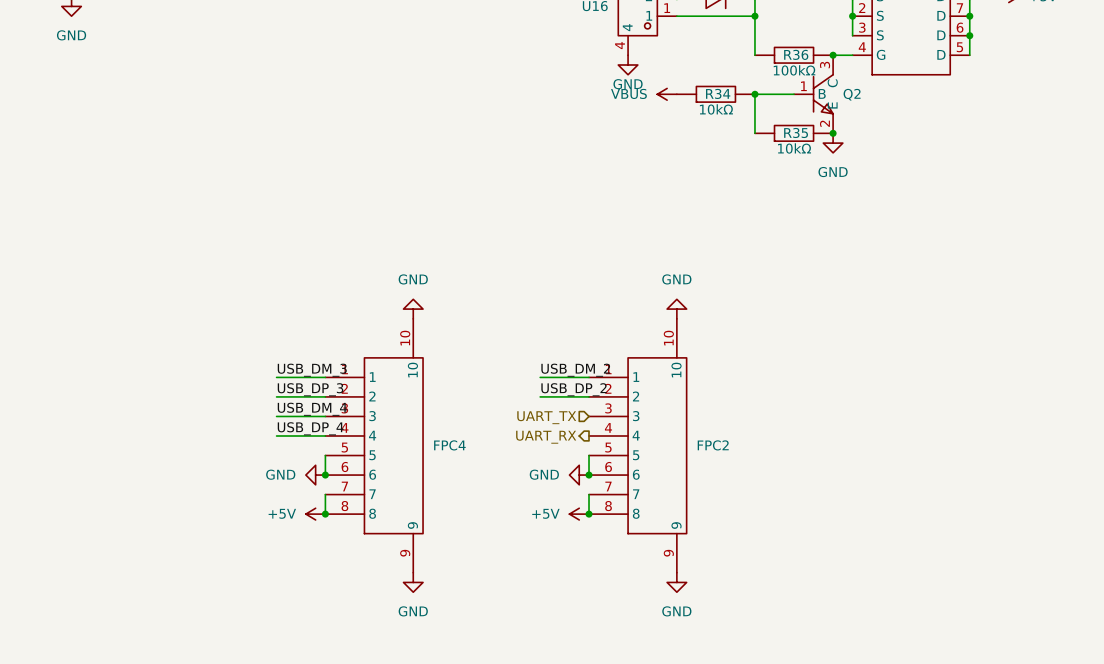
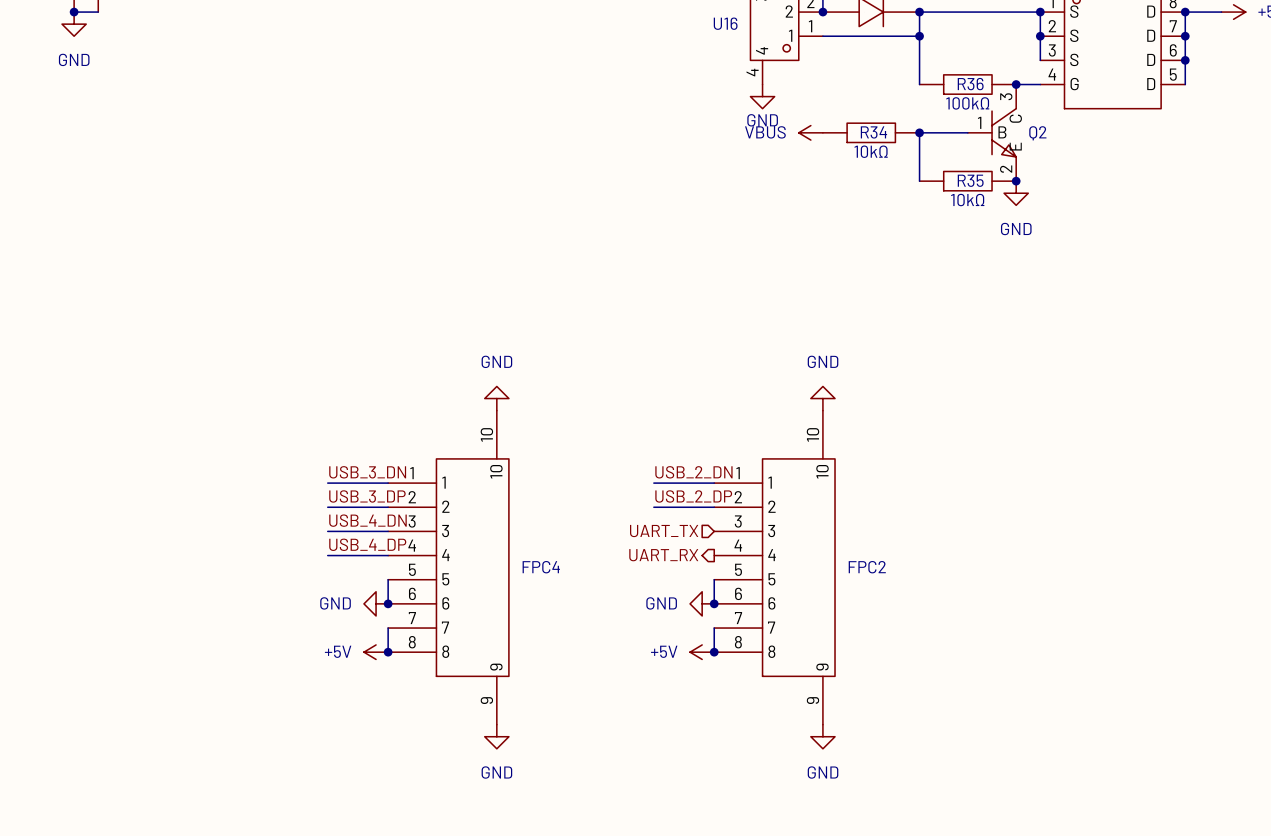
label: USB_DM_3 (312, 370) -> USB_3_DN (367, 472)
label: USB_DM_2 (575, 370) -> USB_2_DN (693, 472)
label: USB_DP_3 (310, 389) -> USB_3_DP (367, 496)
label: USB_DP_2 (573, 389) -> USB_2_DP (693, 496)
label: USB_DM_4 (312, 409) -> USB_4_DN (367, 520)
label: USB_DP_4 (310, 428) -> USB_4_DP (367, 544)

